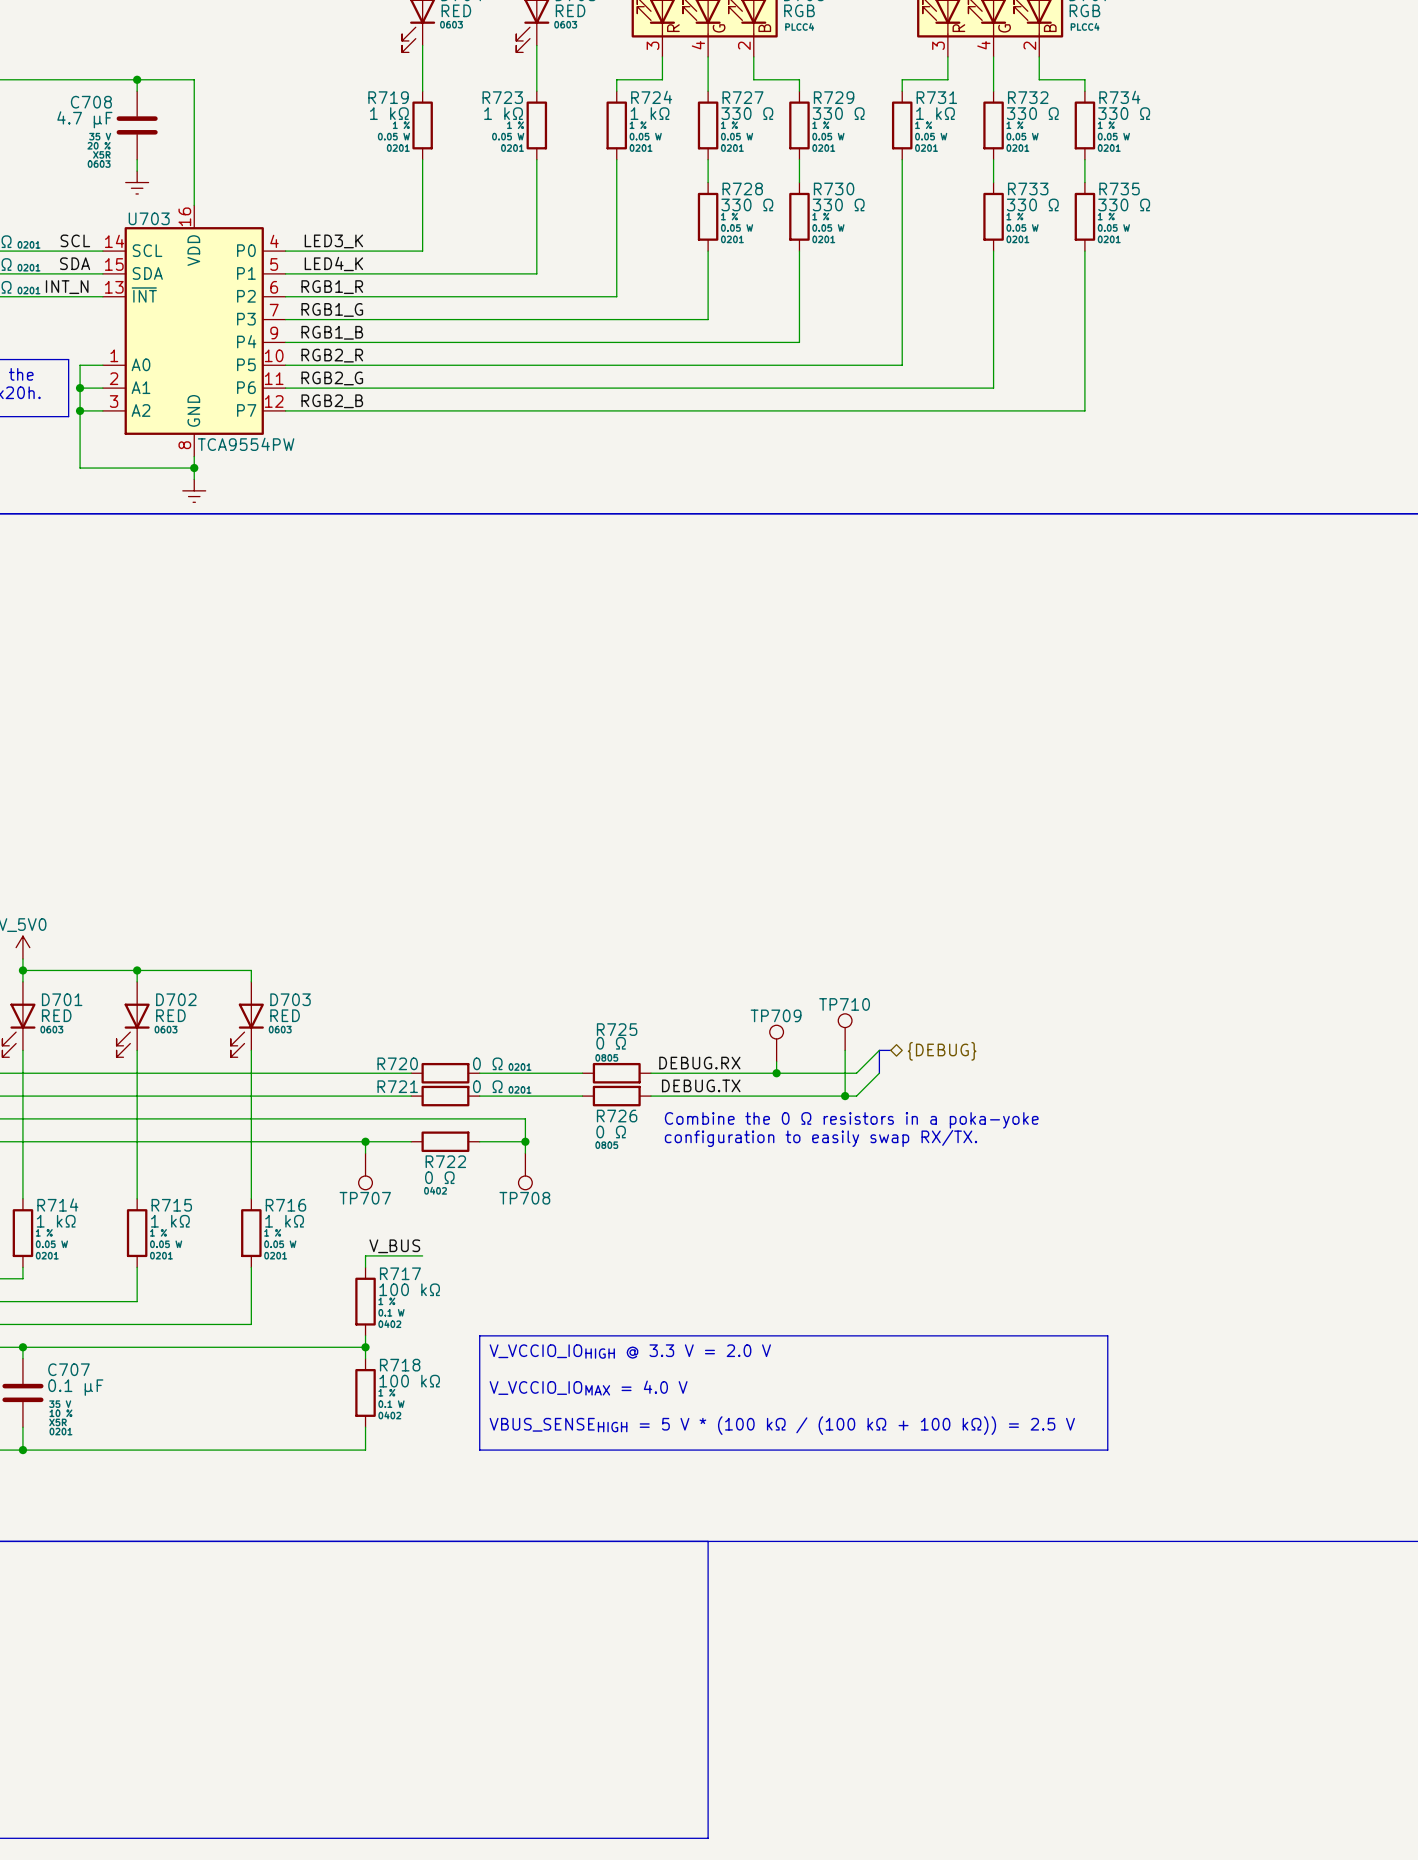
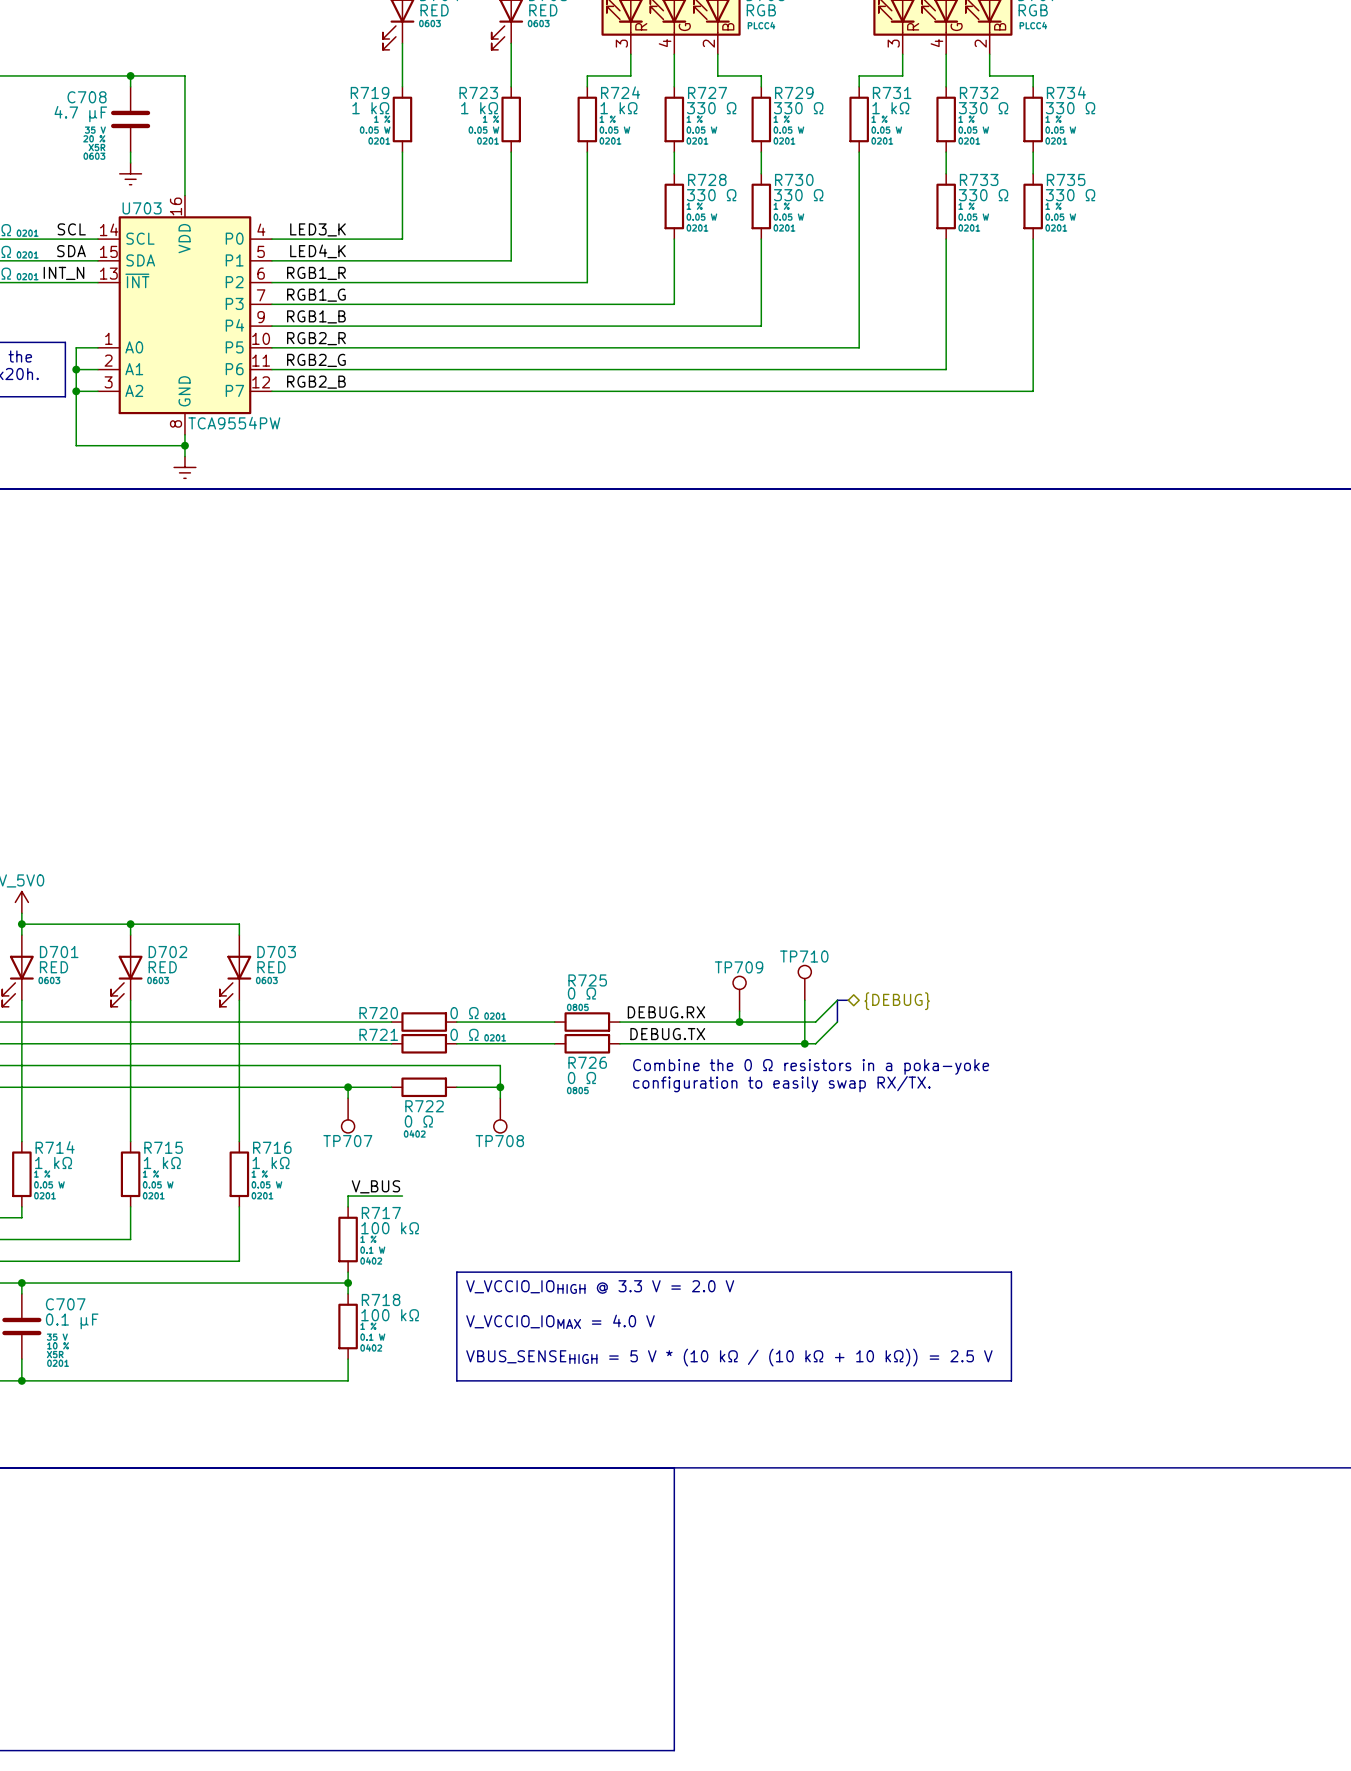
line: (1062, 1335) (1107, 1335) (1107, 1450) (1062, 1450) -> (1011, 1272) (1011, 1380)
text: VBUS_SENSEHIGH = 5 V * (100 kΩ / (100 kΩ + 100 kΩ)) = 2.5 V (782, 1425) -> VBUS_SENSEHIGH = 5 V * (10 kΩ / (10 kΩ + 10 kΩ)) = 2.5 V (729, 1357)

